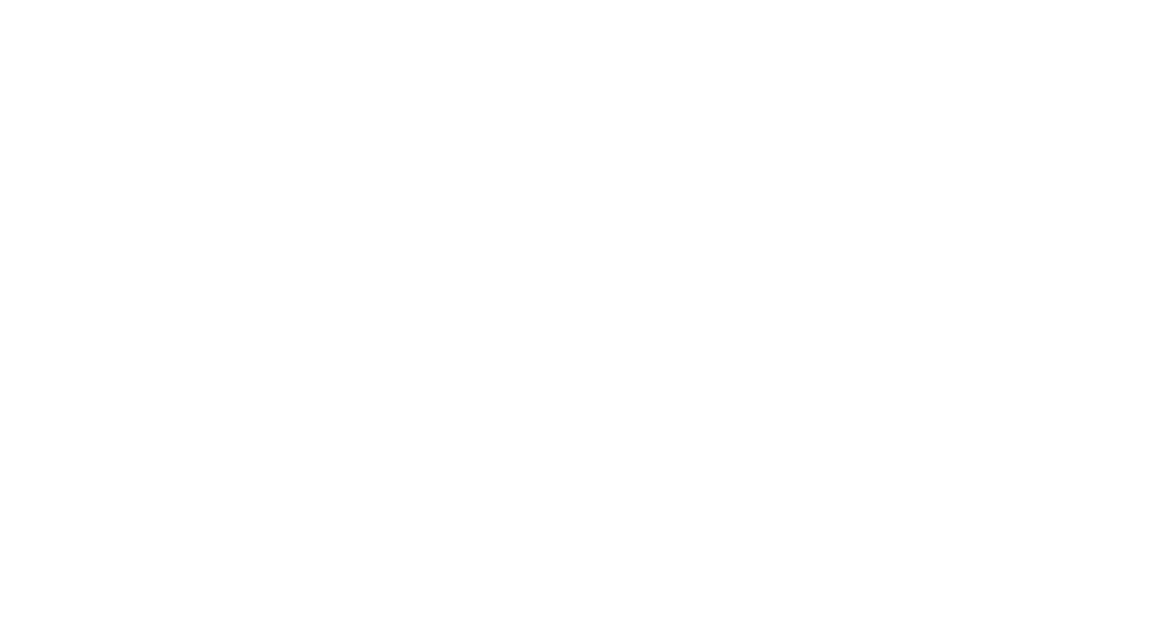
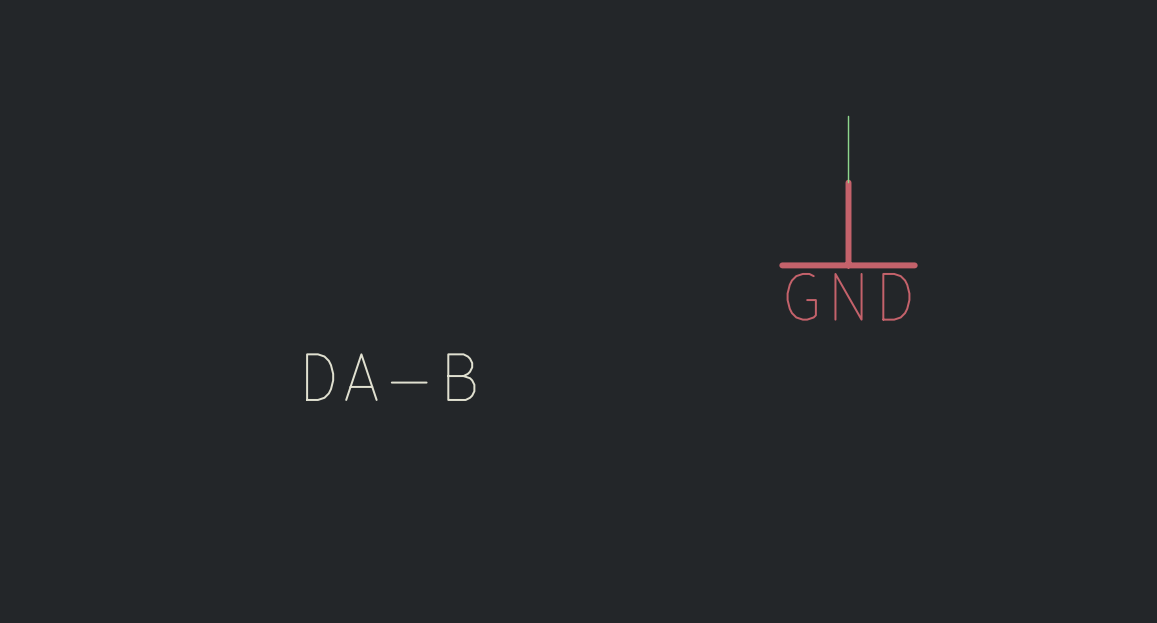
wire: none -> (848, 116) (848, 182)
power symbol: none -> (848, 224)
label: none -> DA-B (390, 377)

